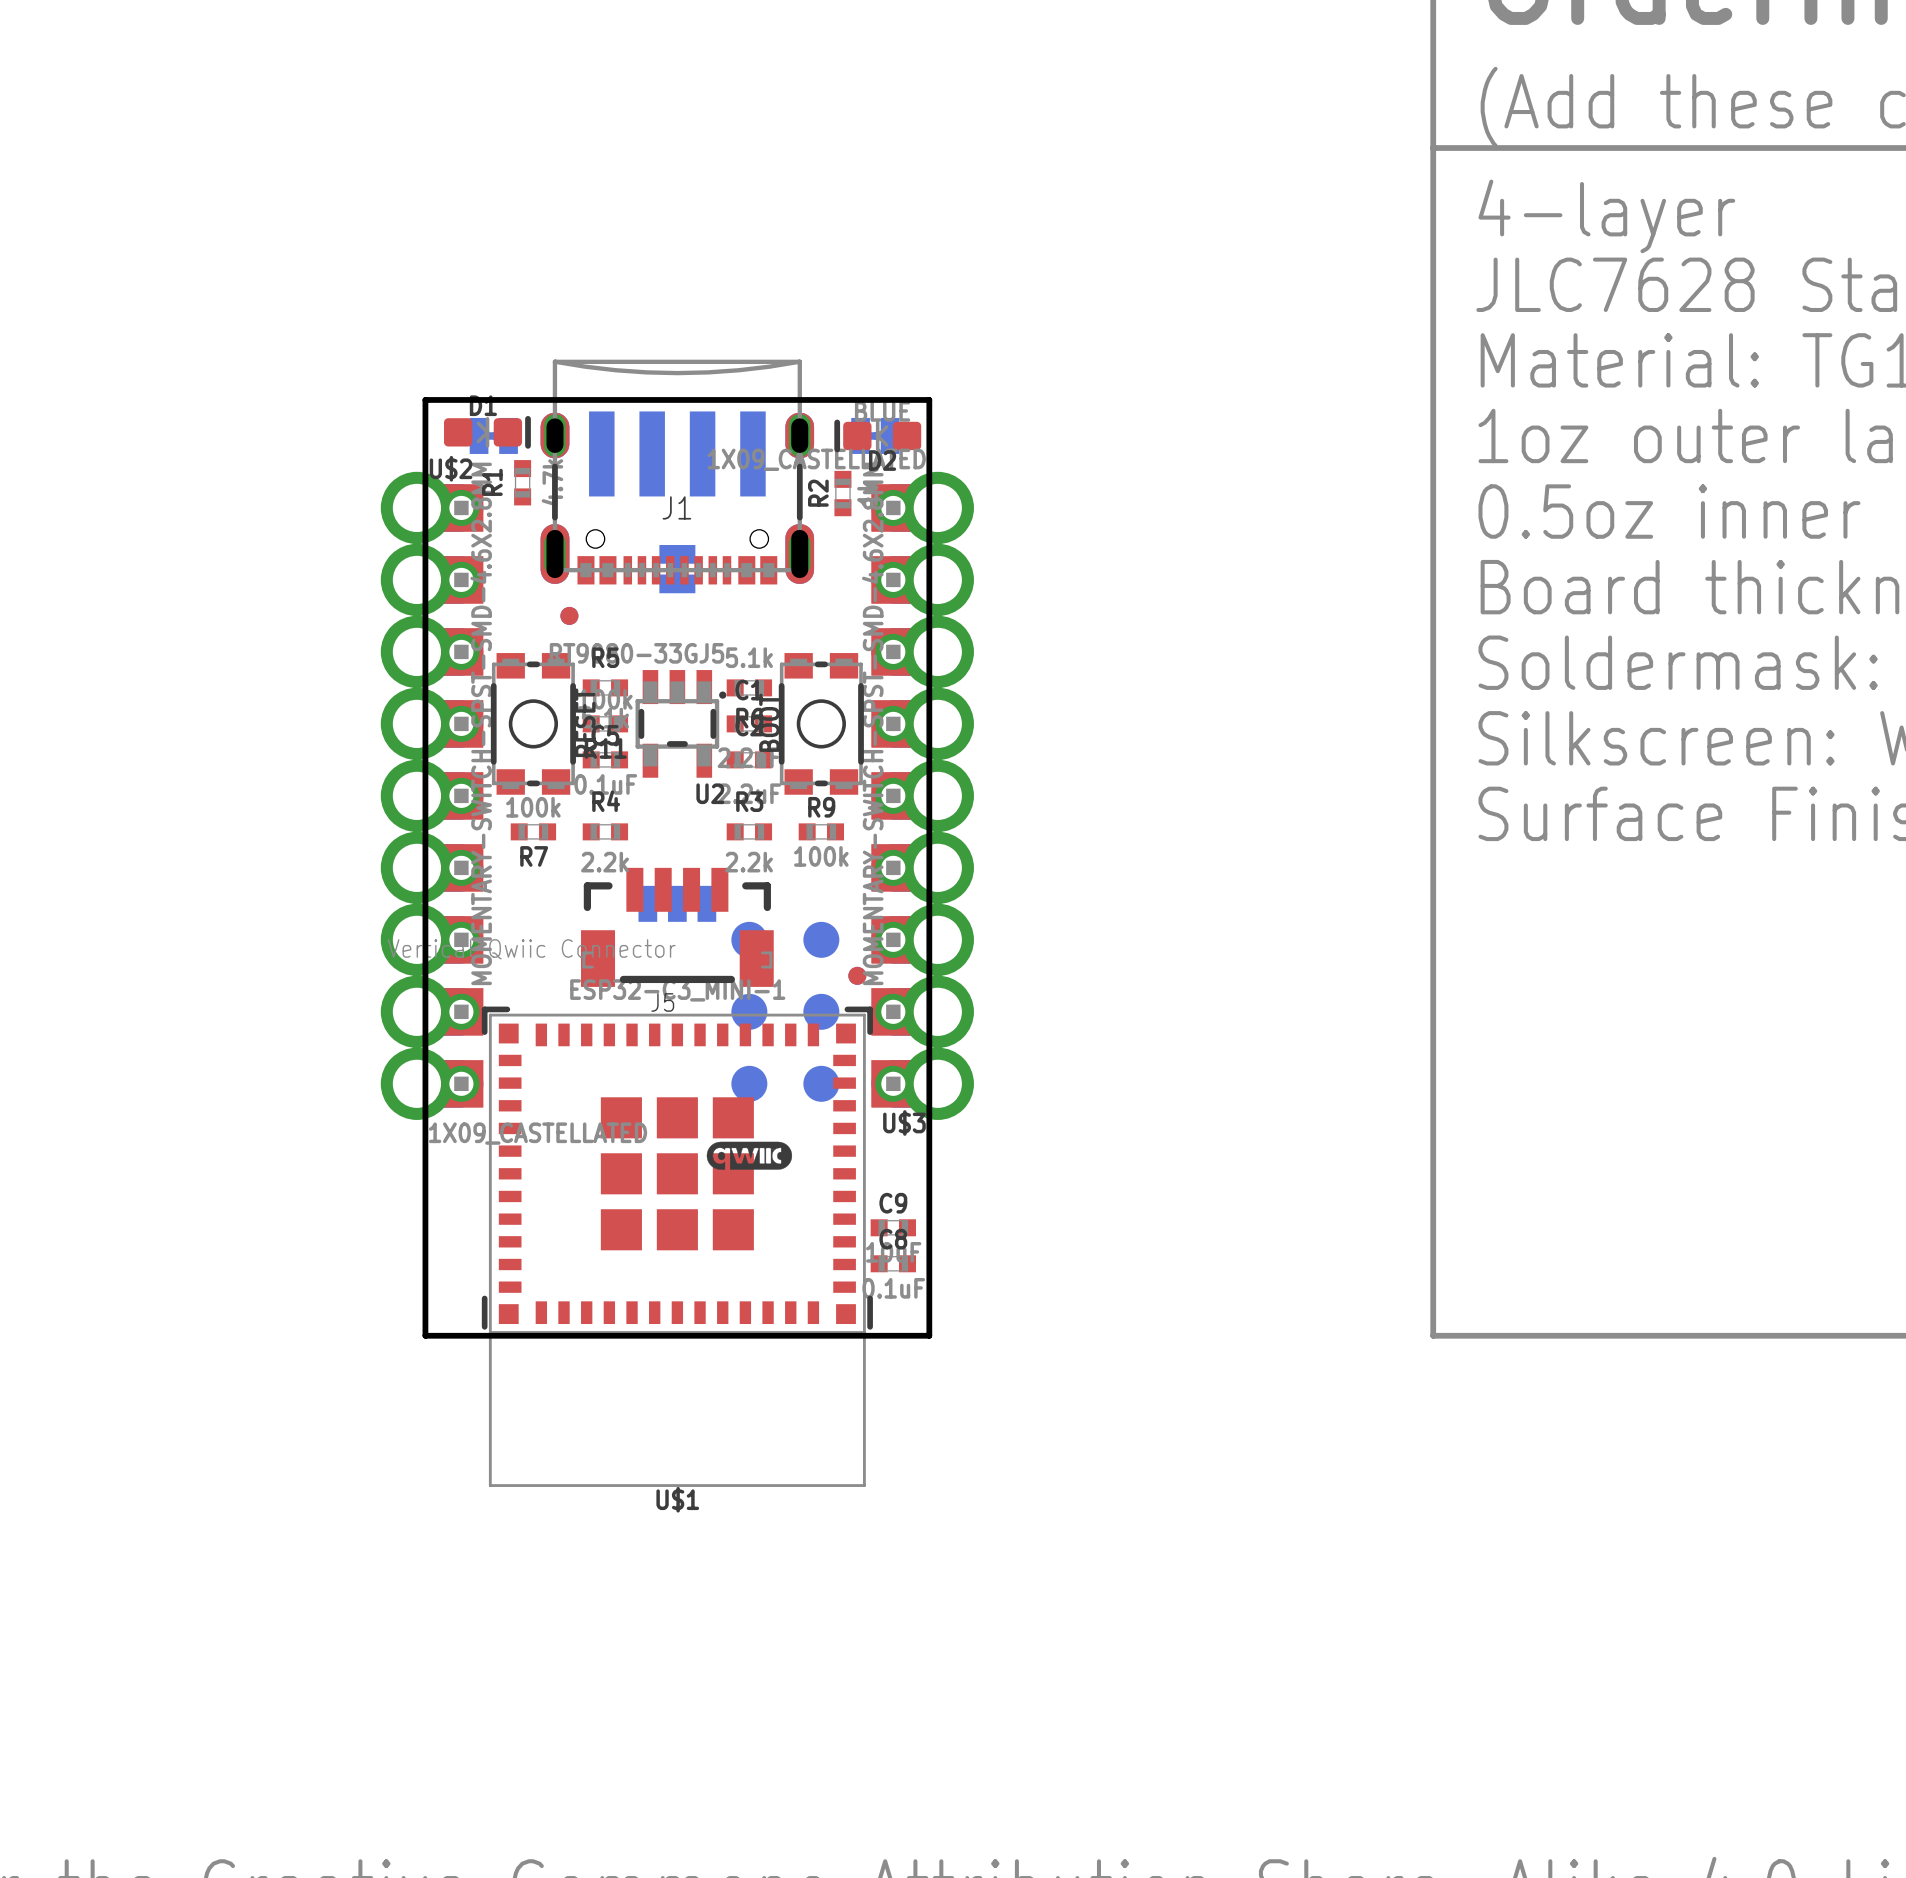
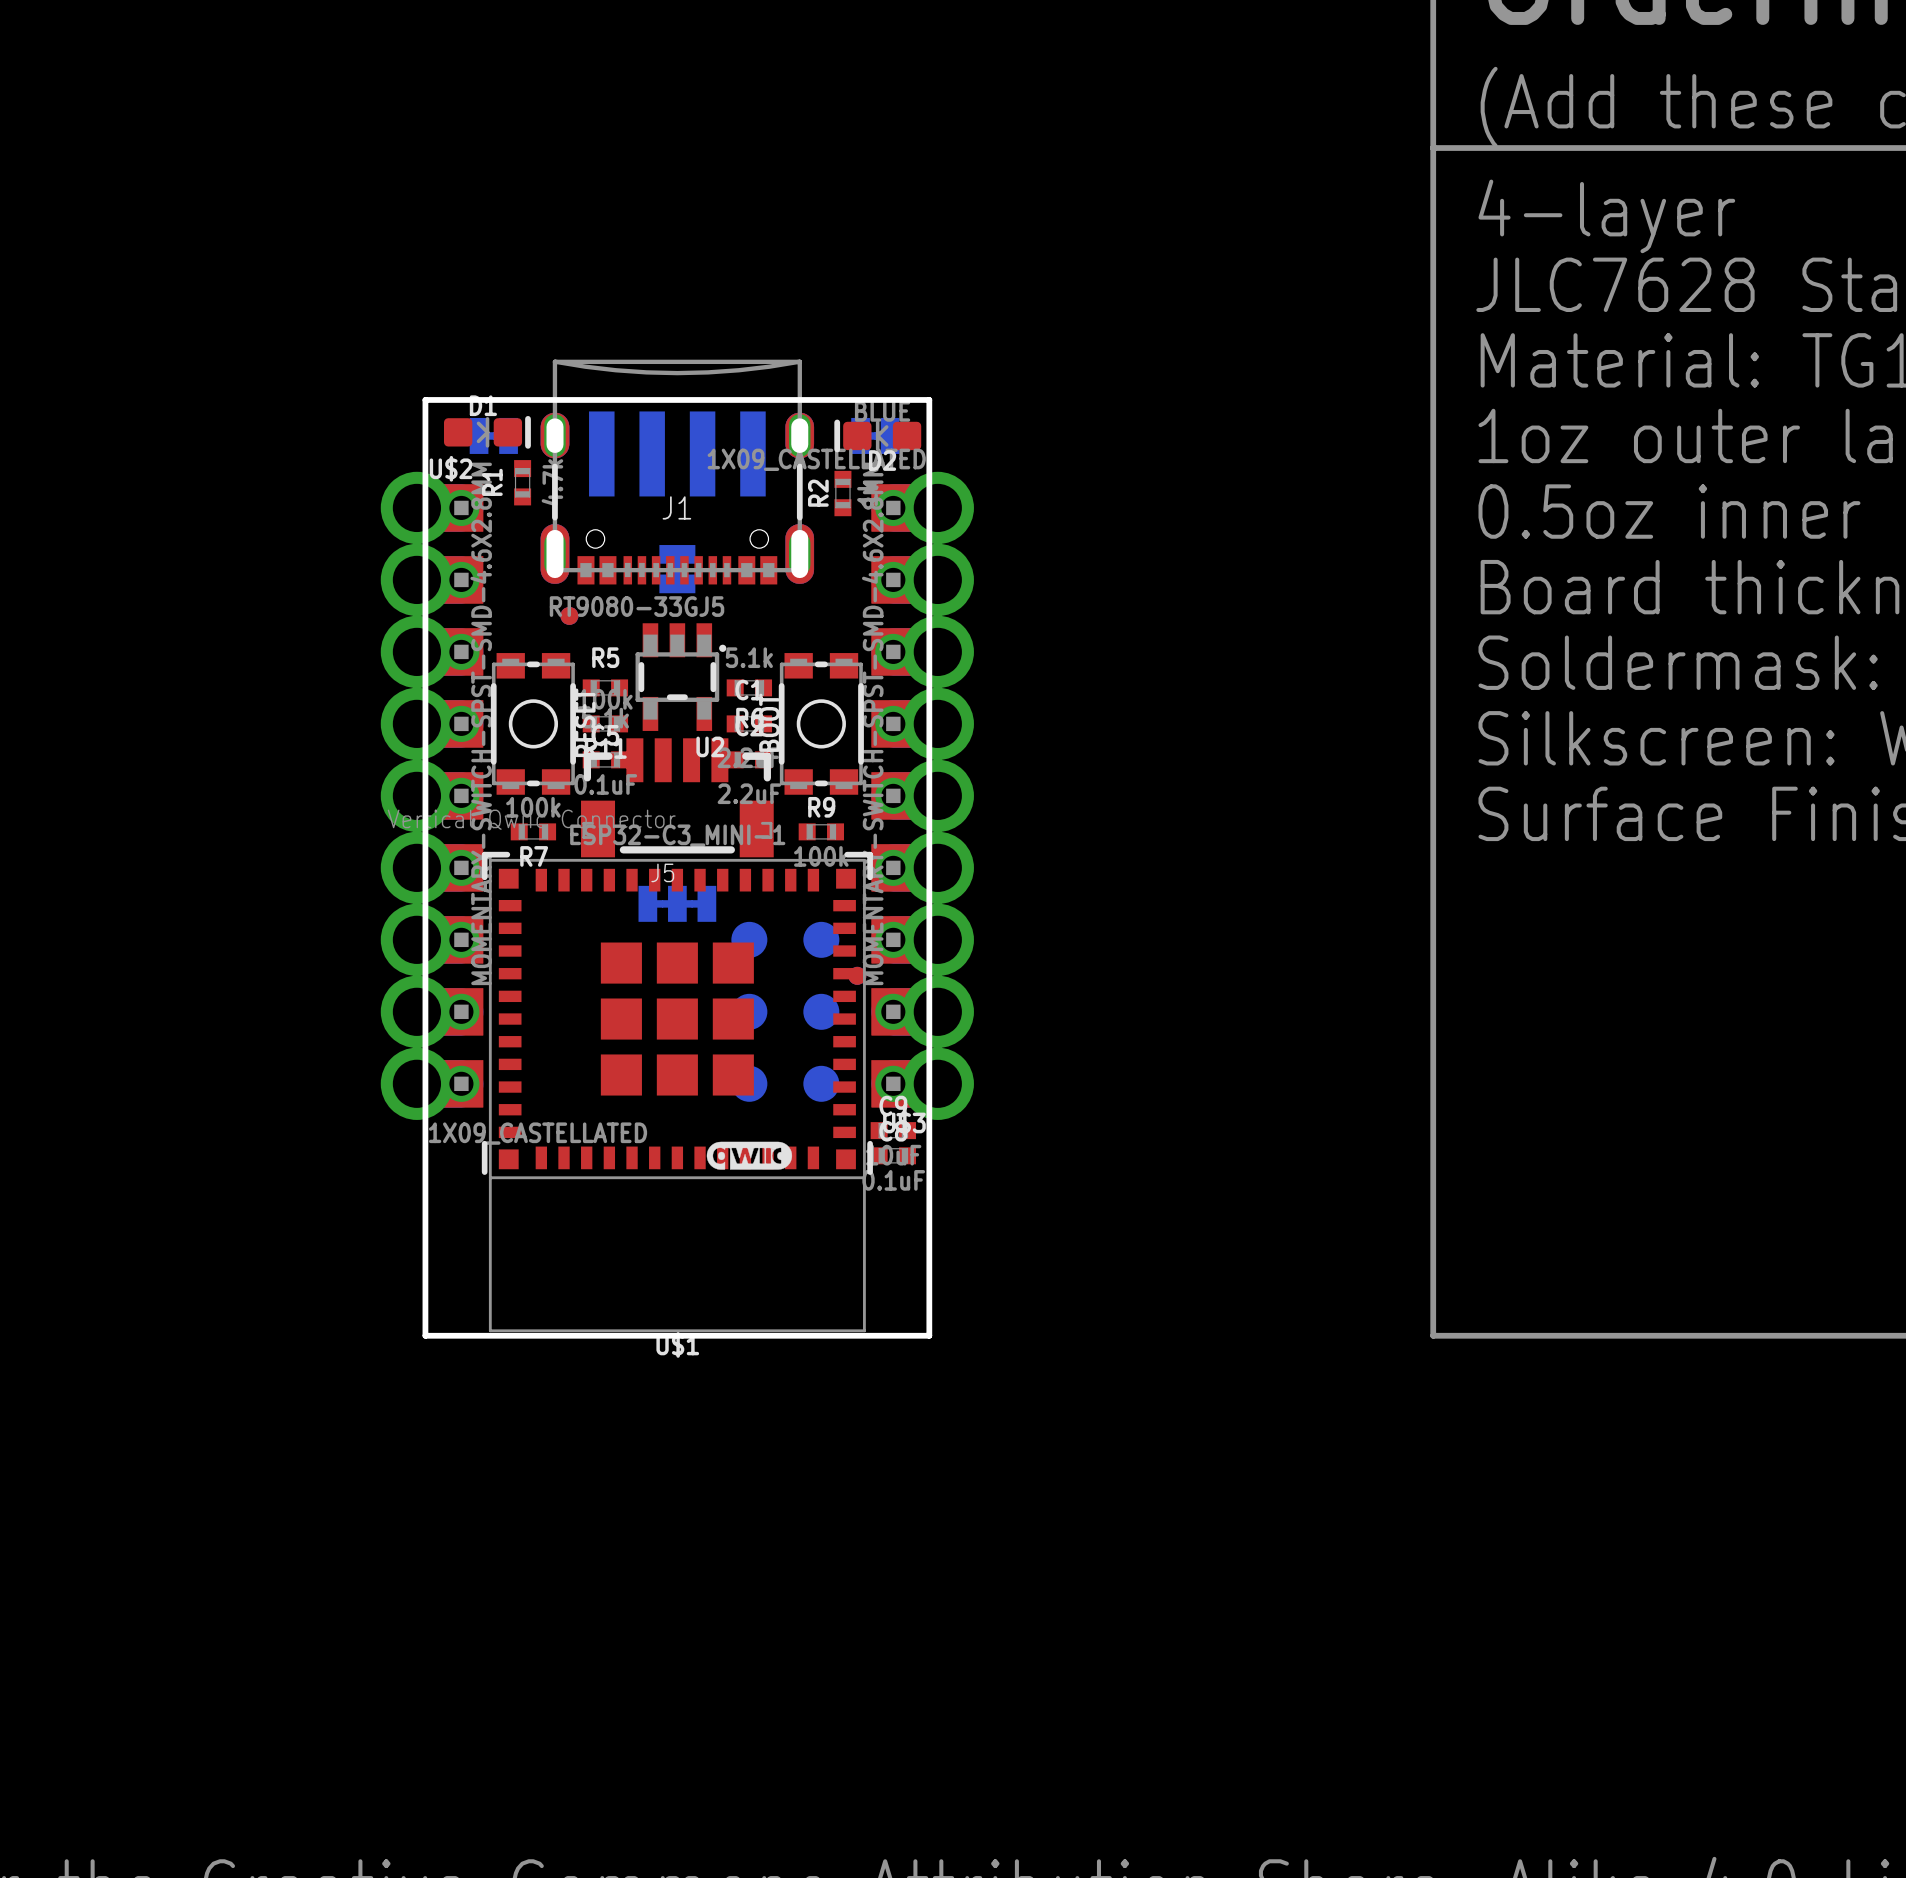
U2 position: (680, 723) -> (680, 677)
R4: 2.2k (605, 831) -> none
R3: 2.2k (749, 831) -> none
J5 position: (677, 927) -> (677, 797)
C9 position: (893, 1227) -> (893, 1130)
U$1 position: (677, 1246) -> (677, 1092)
C8 position: (893, 1263) -> (893, 1155)

